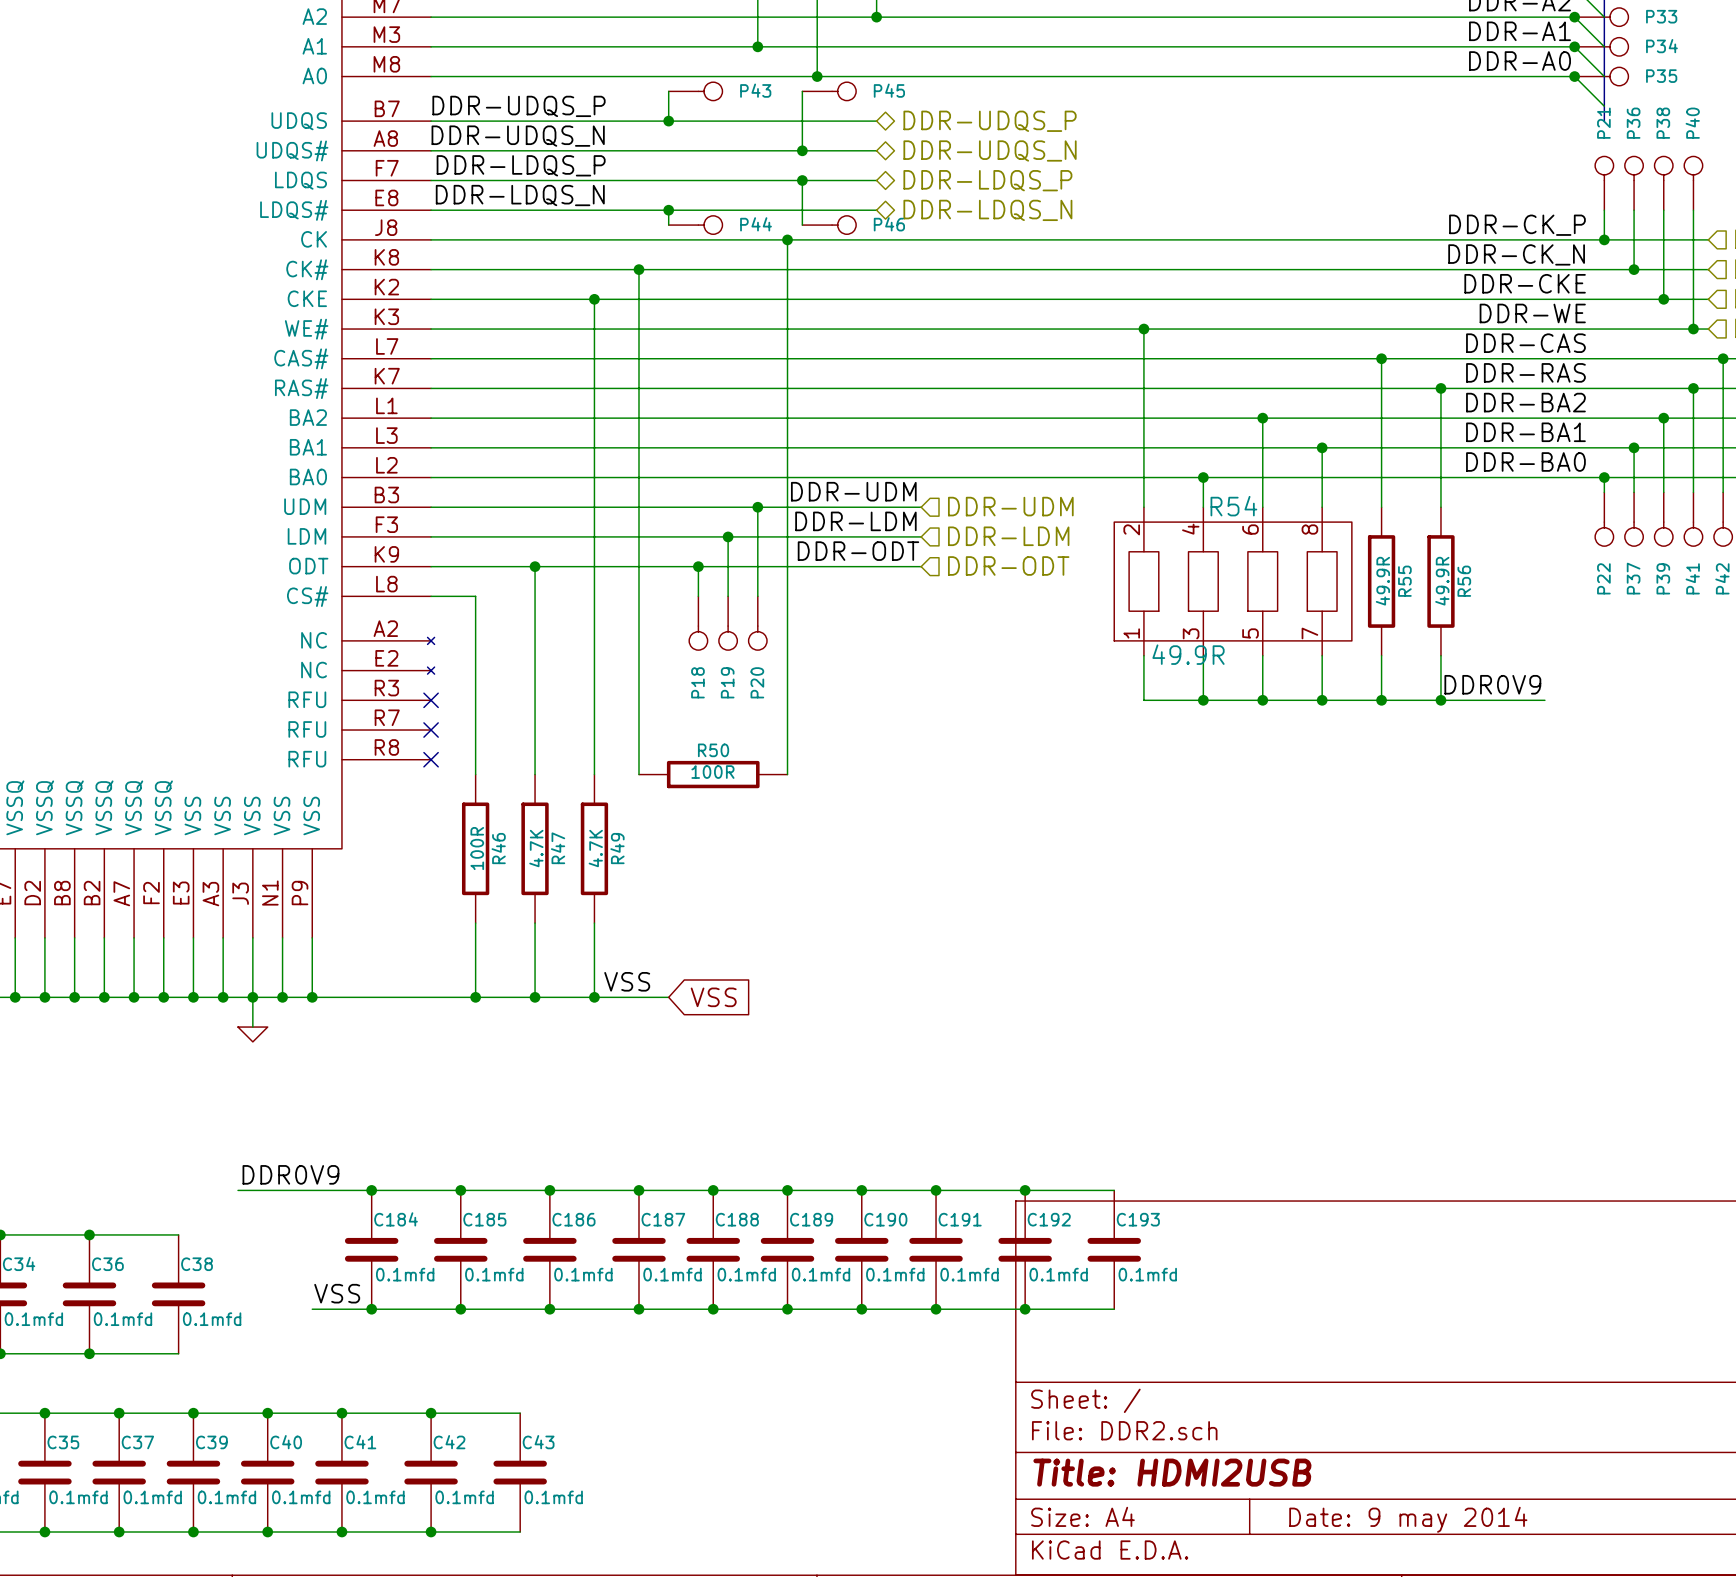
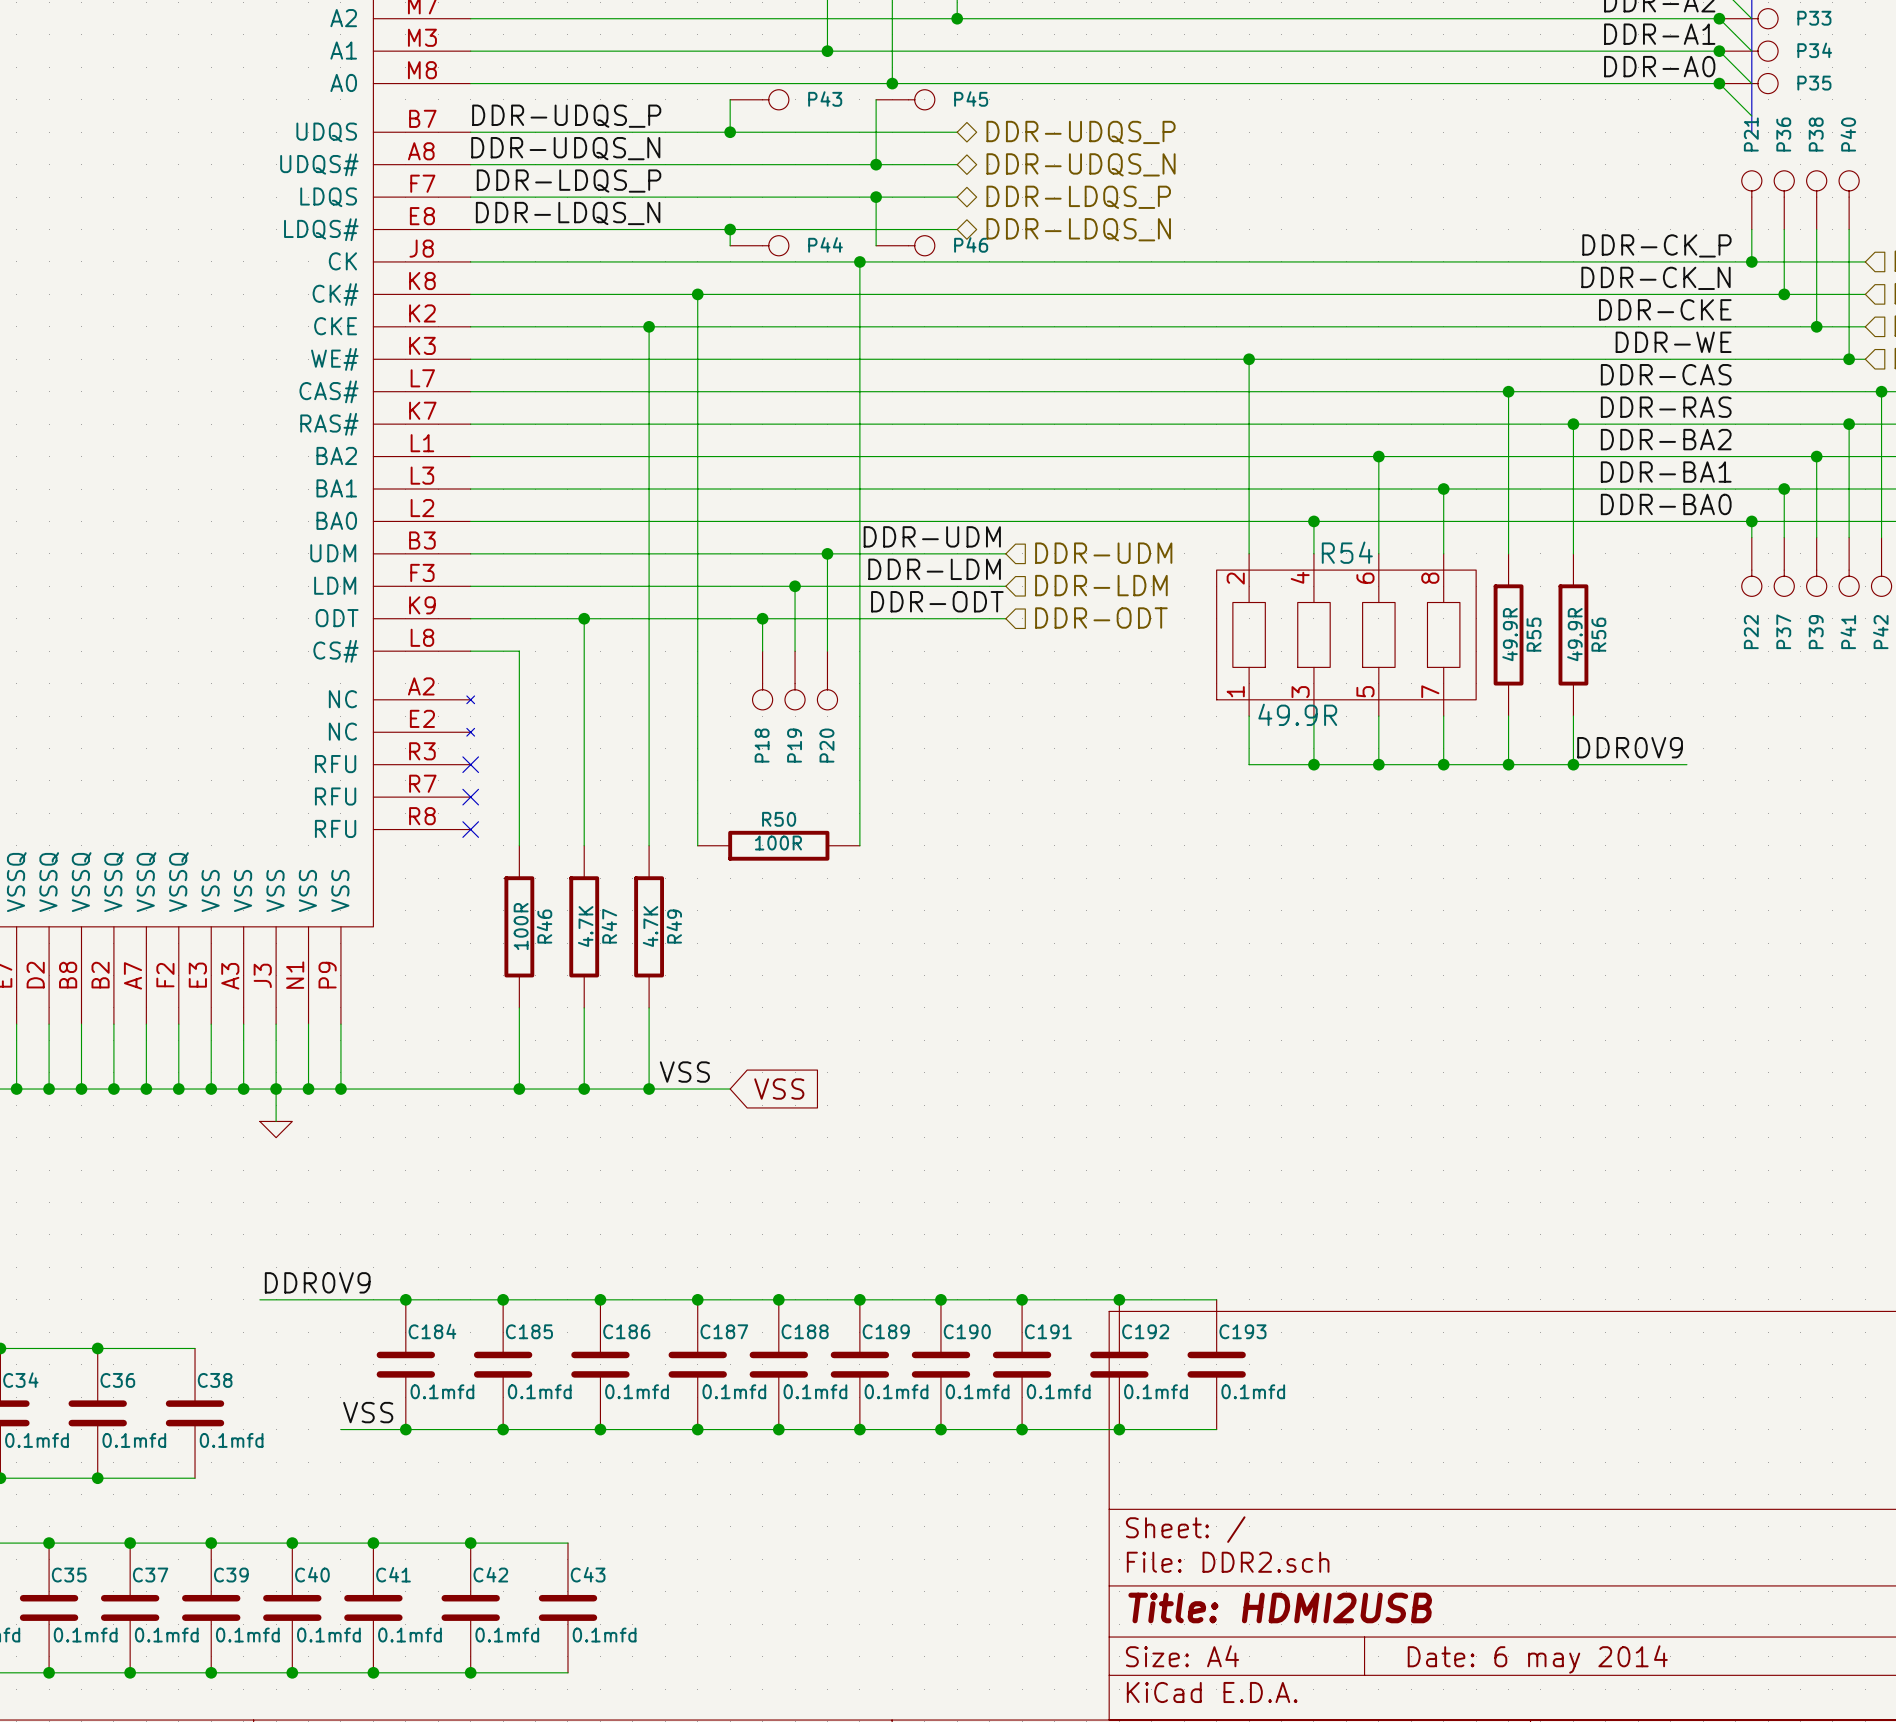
title block: Date: 9 may 2014 (1408, 1519) -> Date: 6 may 2014 (1537, 1659)

